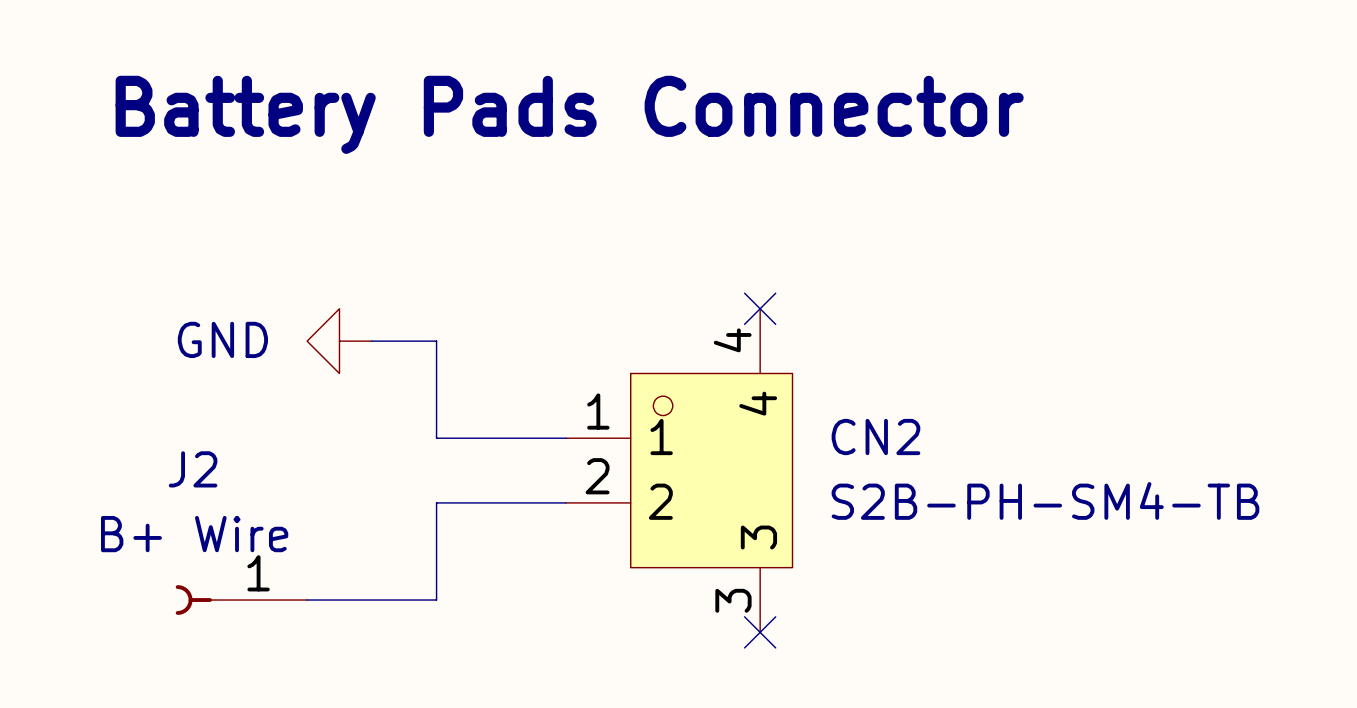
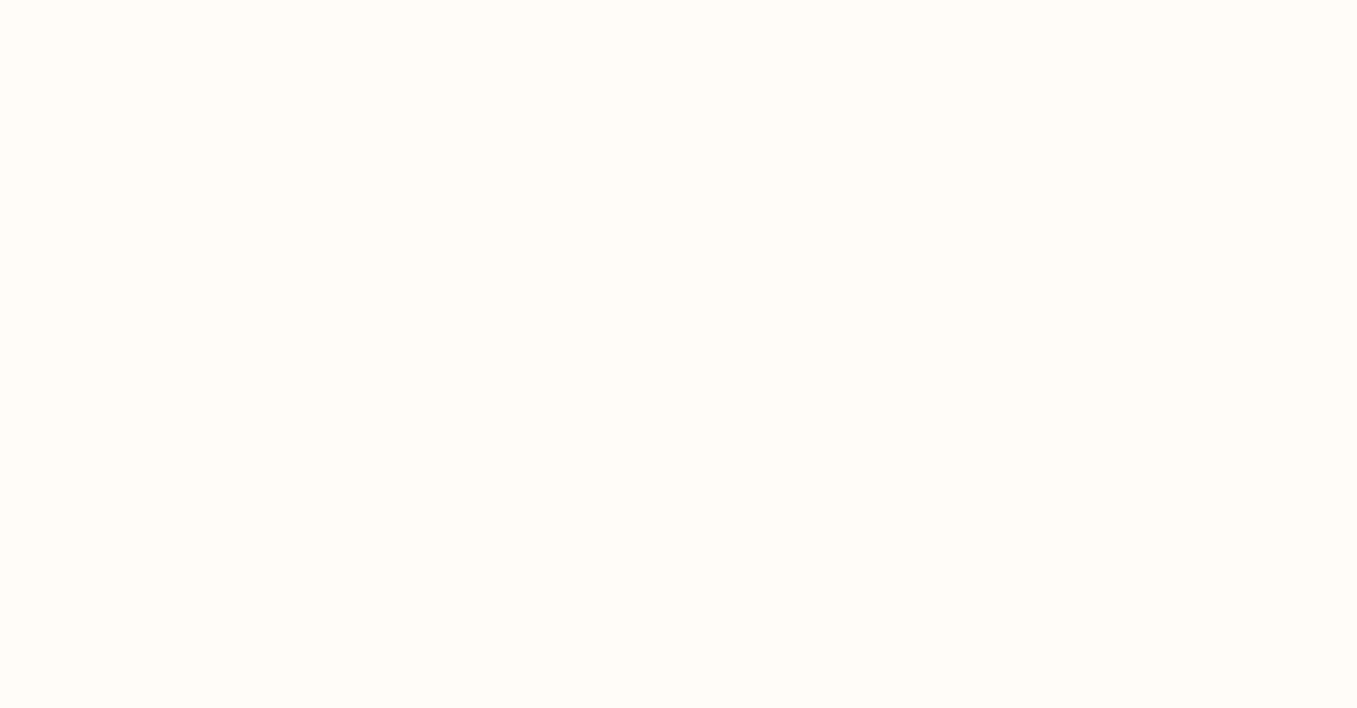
text: Battery Pads Connector (569, 114) -> none
no-connect mark: (760, 308) -> none
power symbol: GND (339, 341) -> none
wire: (371, 341) (436, 341) (436, 438) (565, 438) -> none
CN2: S2B-PH-SM4-TB (679, 470) -> none
wire: (565, 502) (436, 502) (436, 600) (307, 600) -> none
J2: B+ Wire (241, 600) -> none
no-connect mark: (760, 632) -> none

